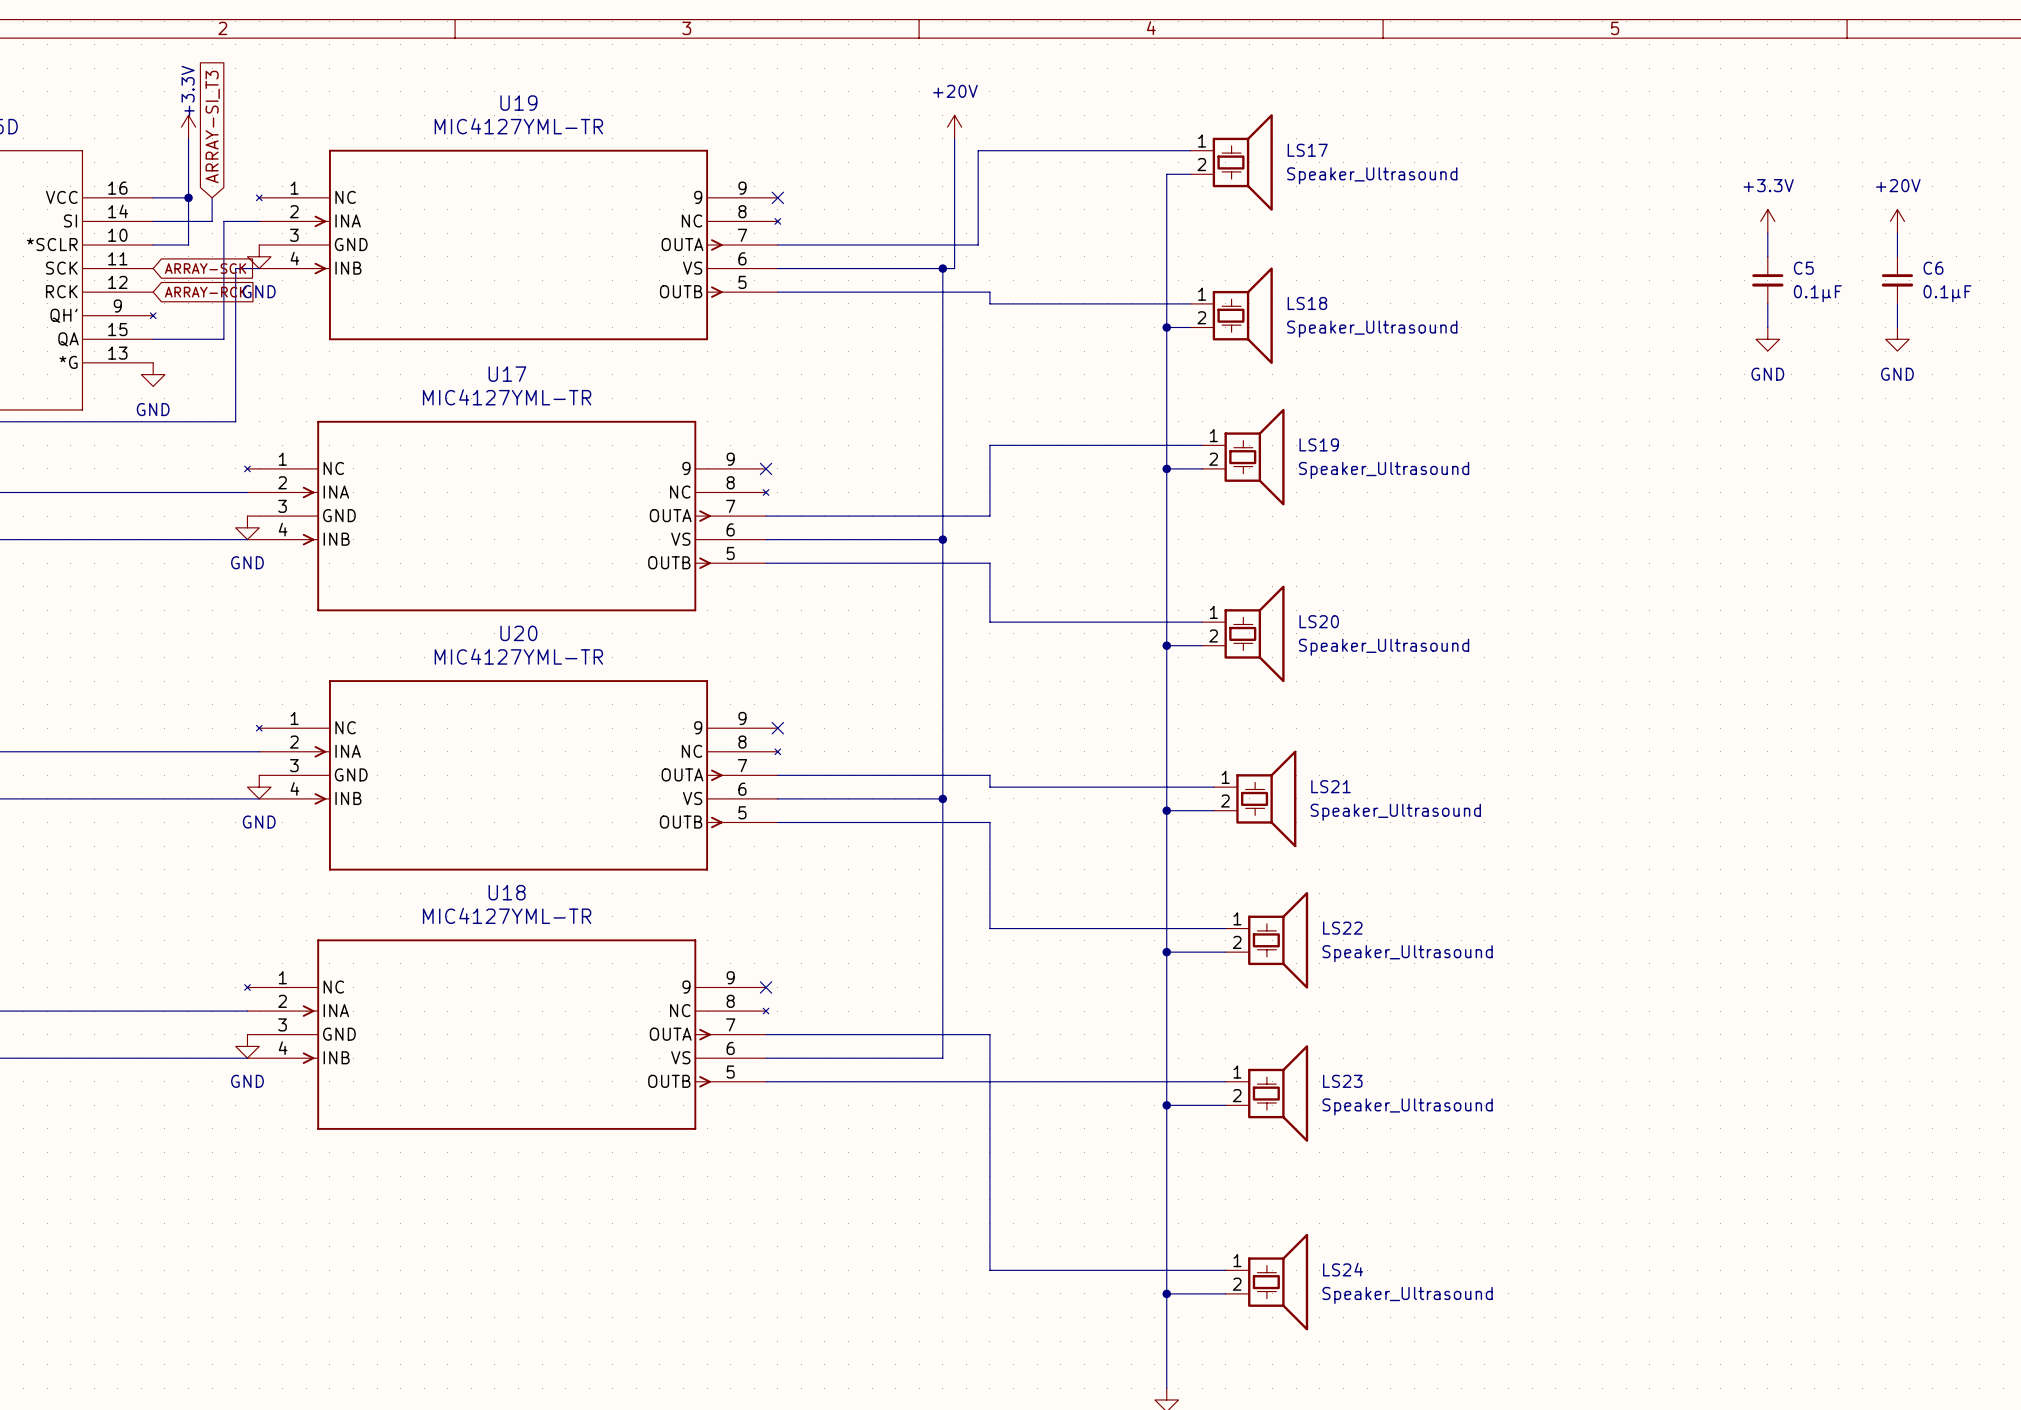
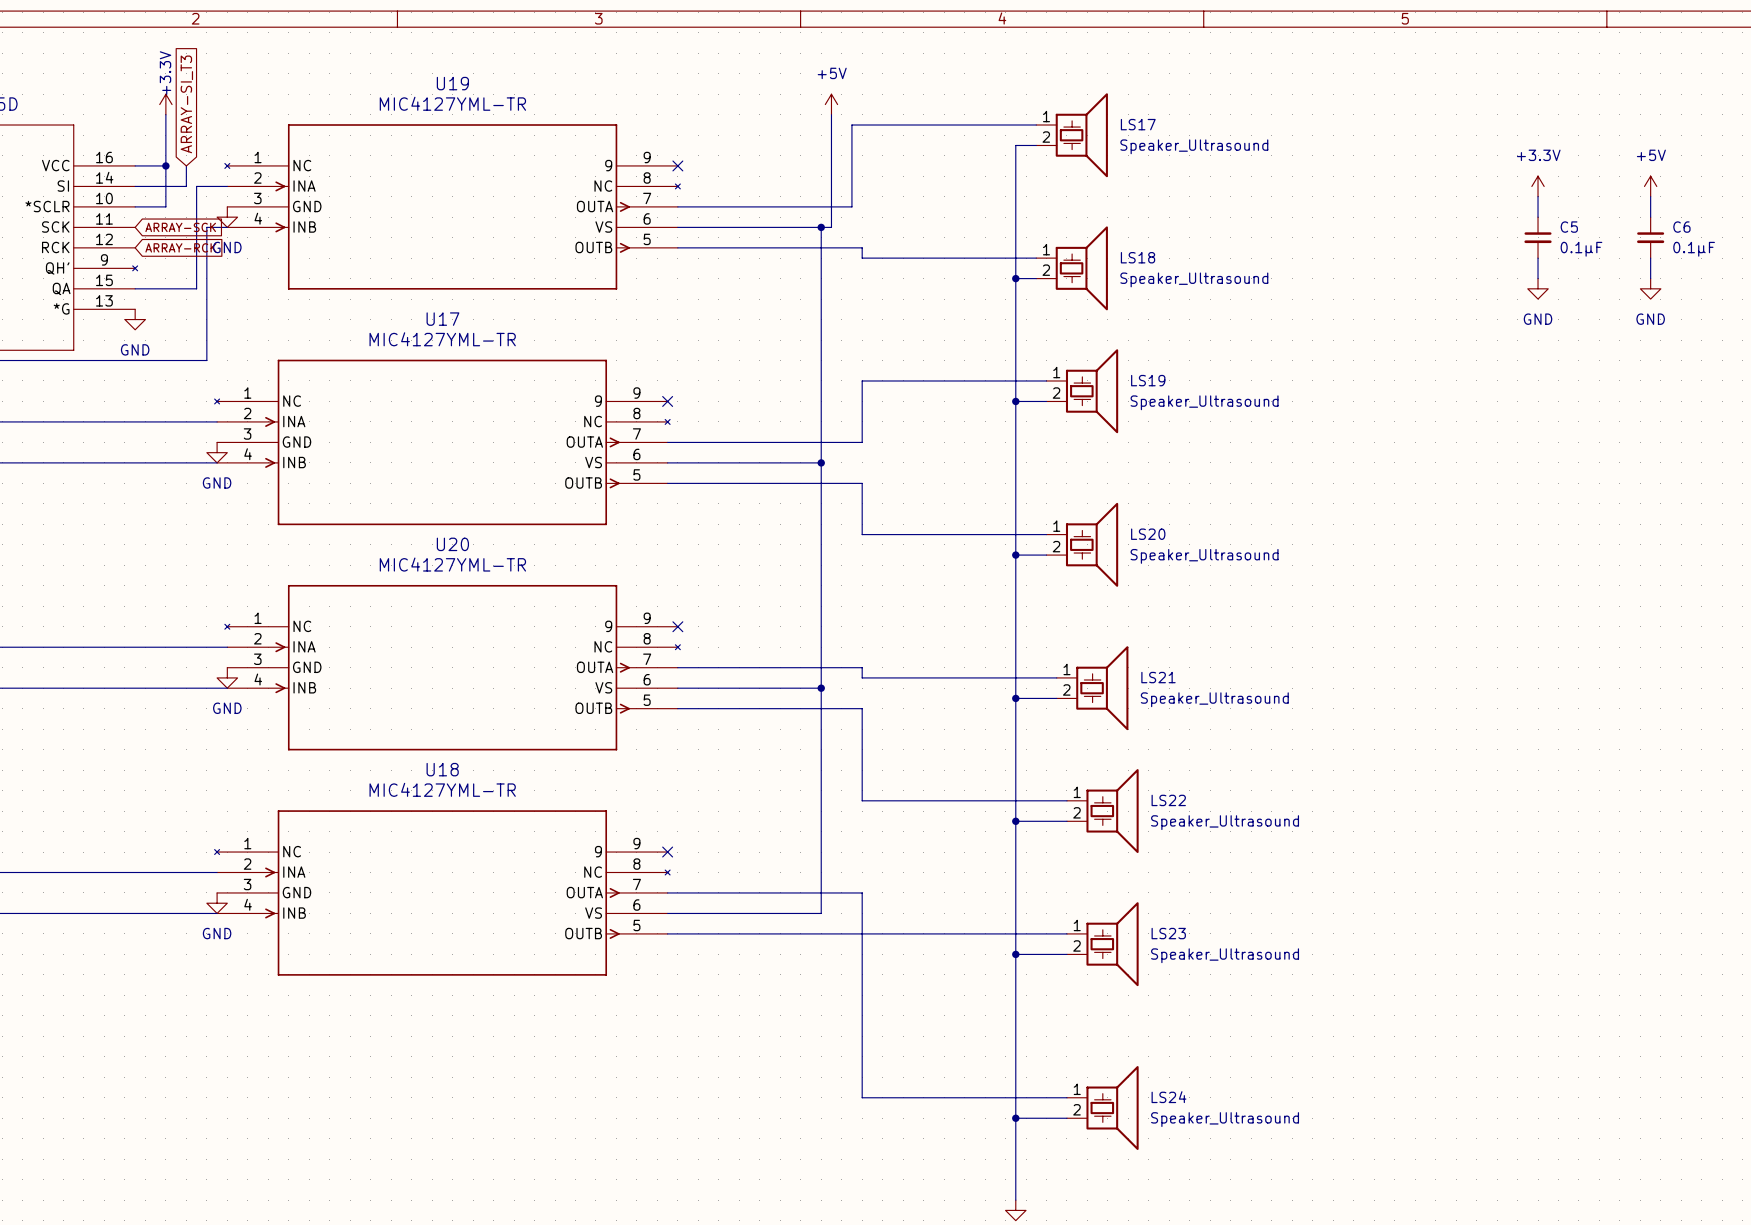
power symbol: +20V (954, 127) -> +5V (831, 104)
power symbol: +20V (1897, 221) -> +5V (1650, 186)

